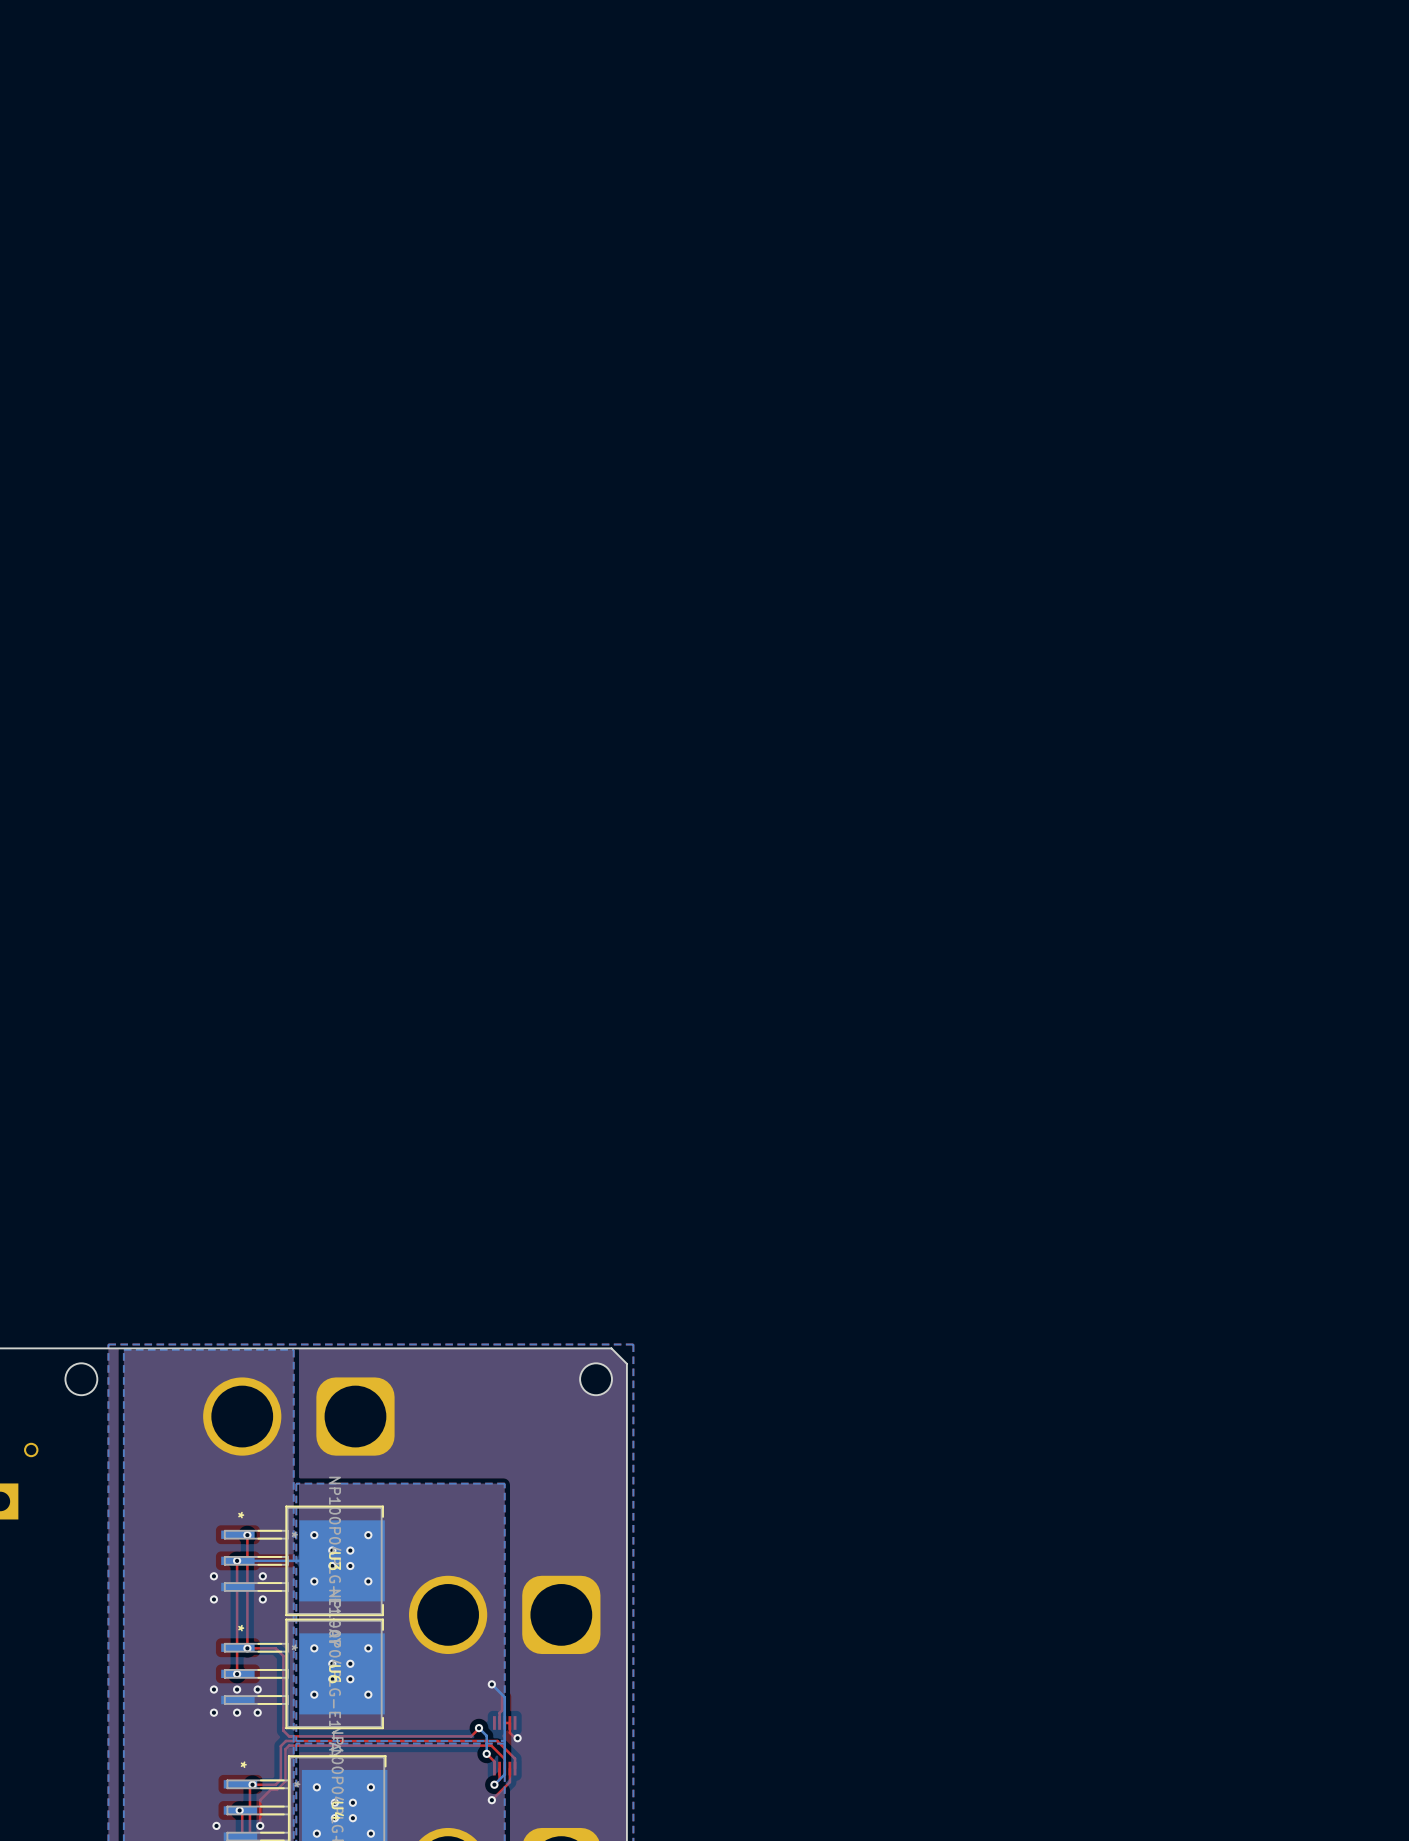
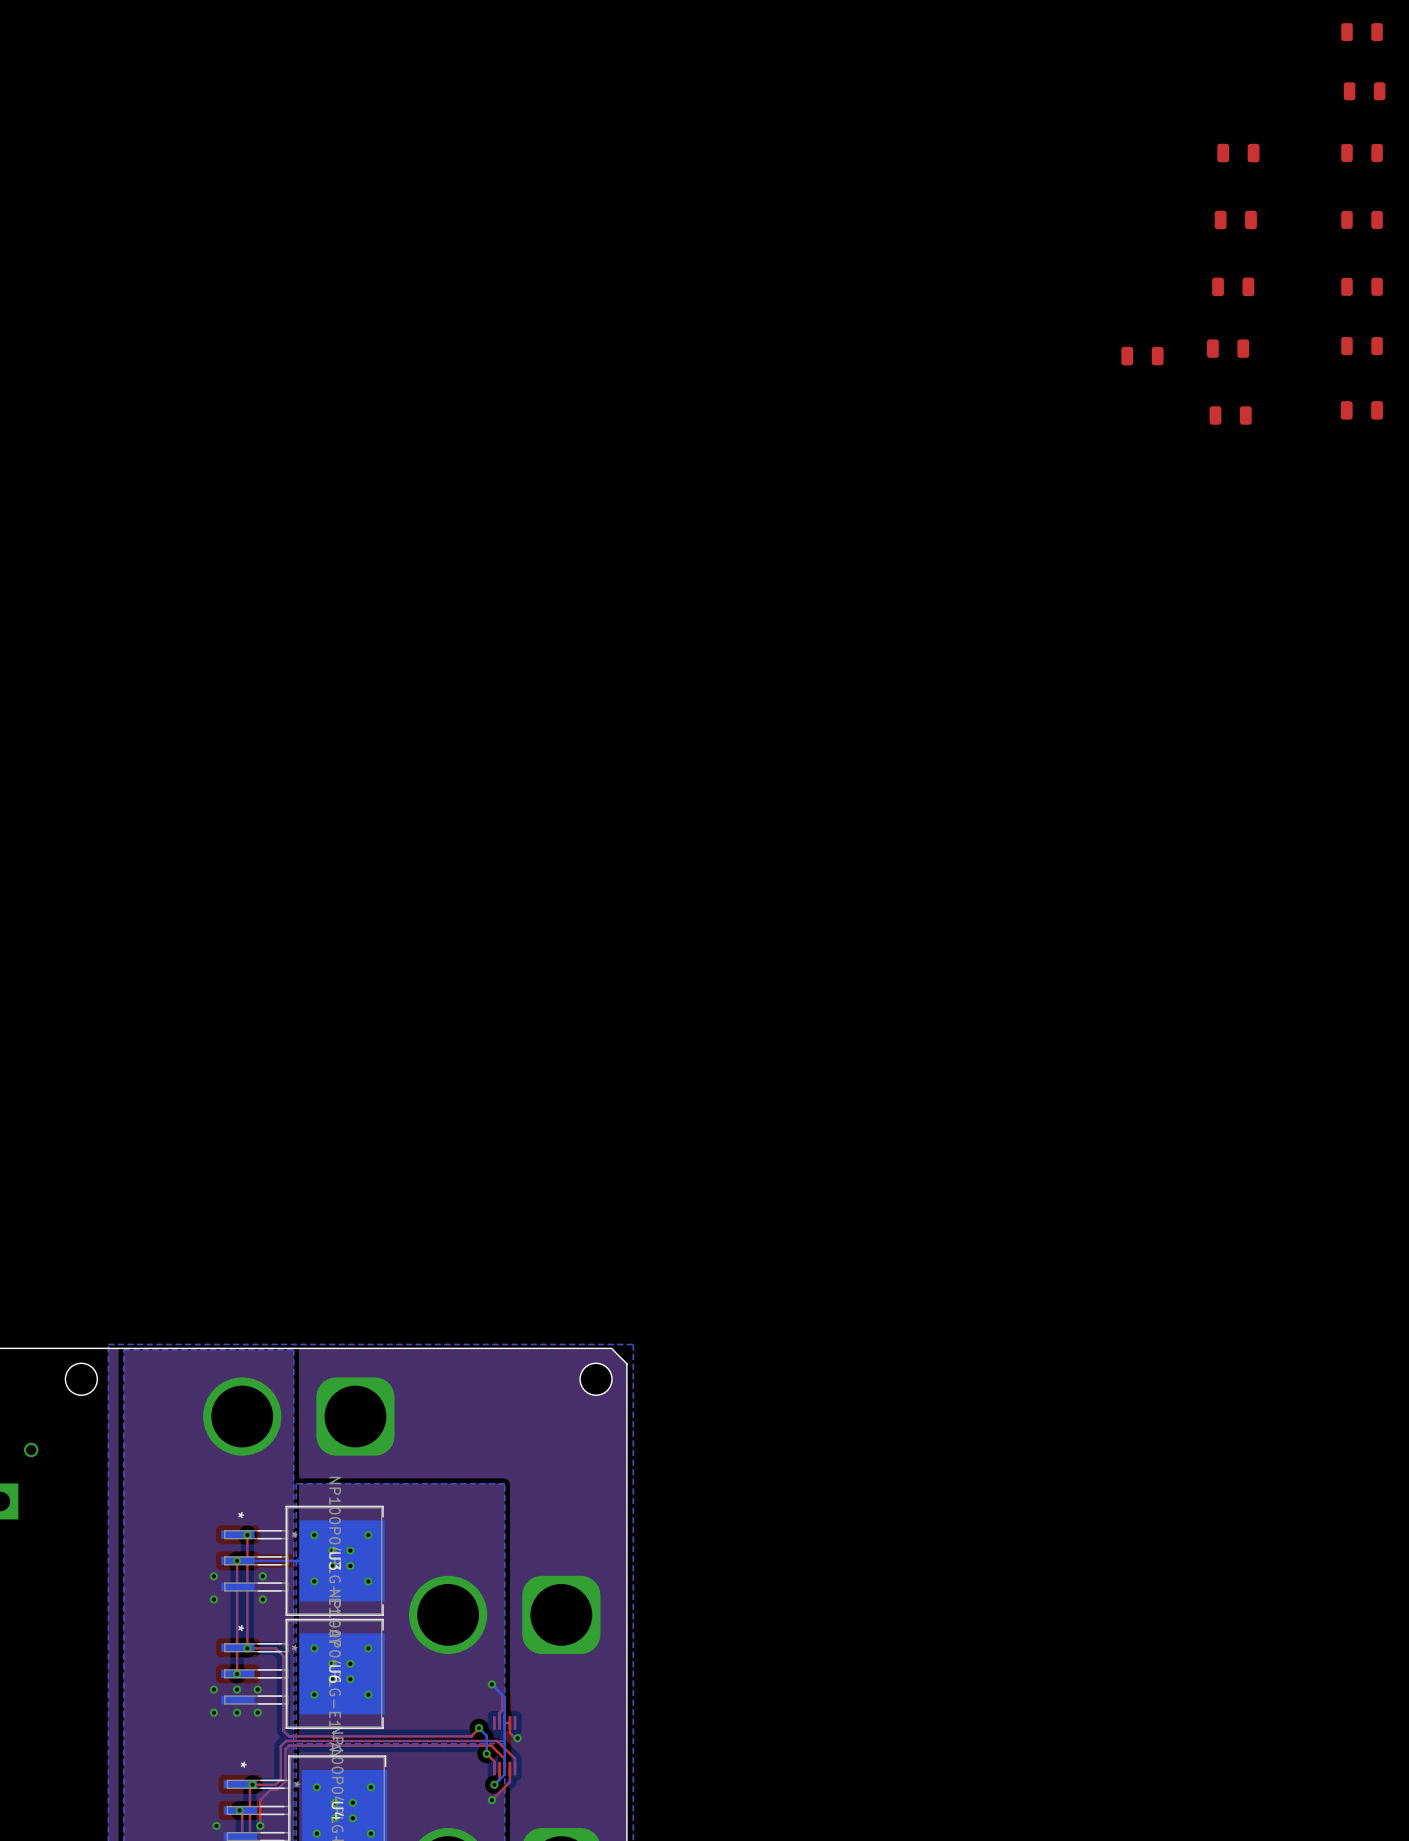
part: none -> (1362, 32)
part: none -> (1364, 91)
part: none -> (1238, 153)
part: none -> (1362, 153)
part: none -> (1235, 219)
part: none -> (1362, 219)
part: none -> (1233, 286)
part: none -> (1362, 286)
part: none -> (1362, 346)
part: none -> (1228, 348)
part: none -> (1142, 356)
part: none -> (1361, 410)
part: none -> (1230, 415)

